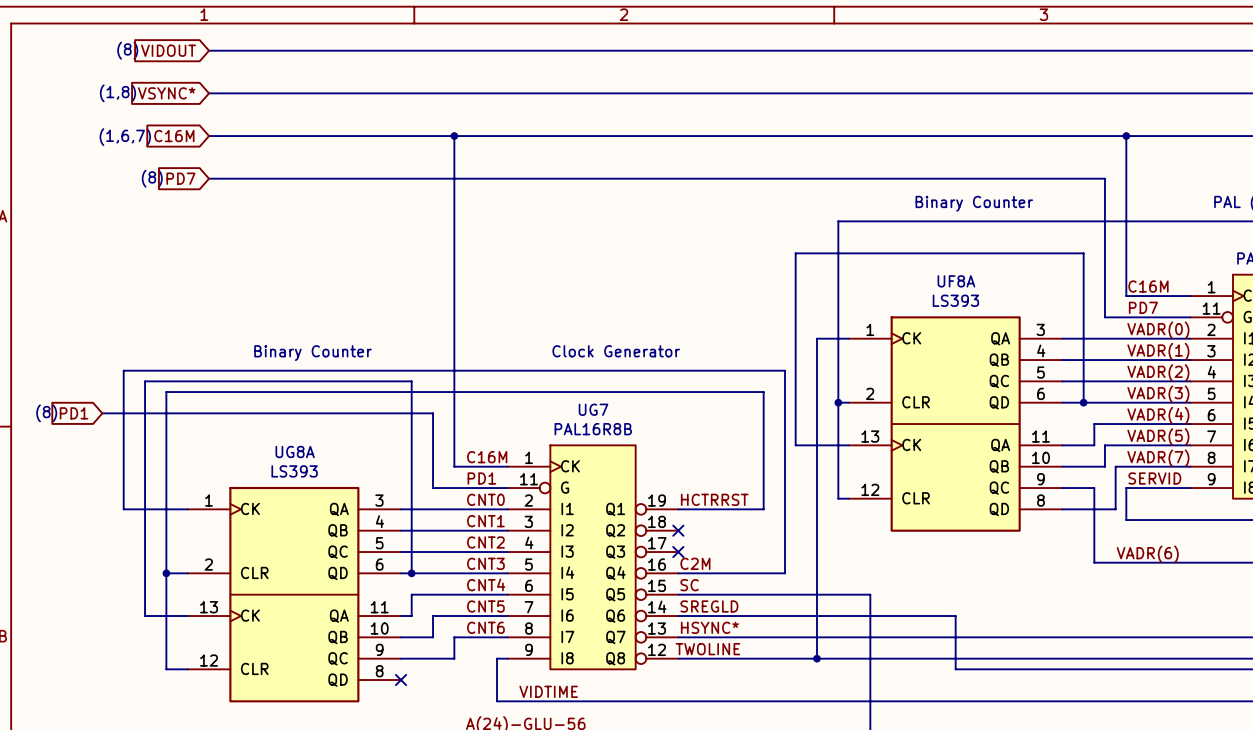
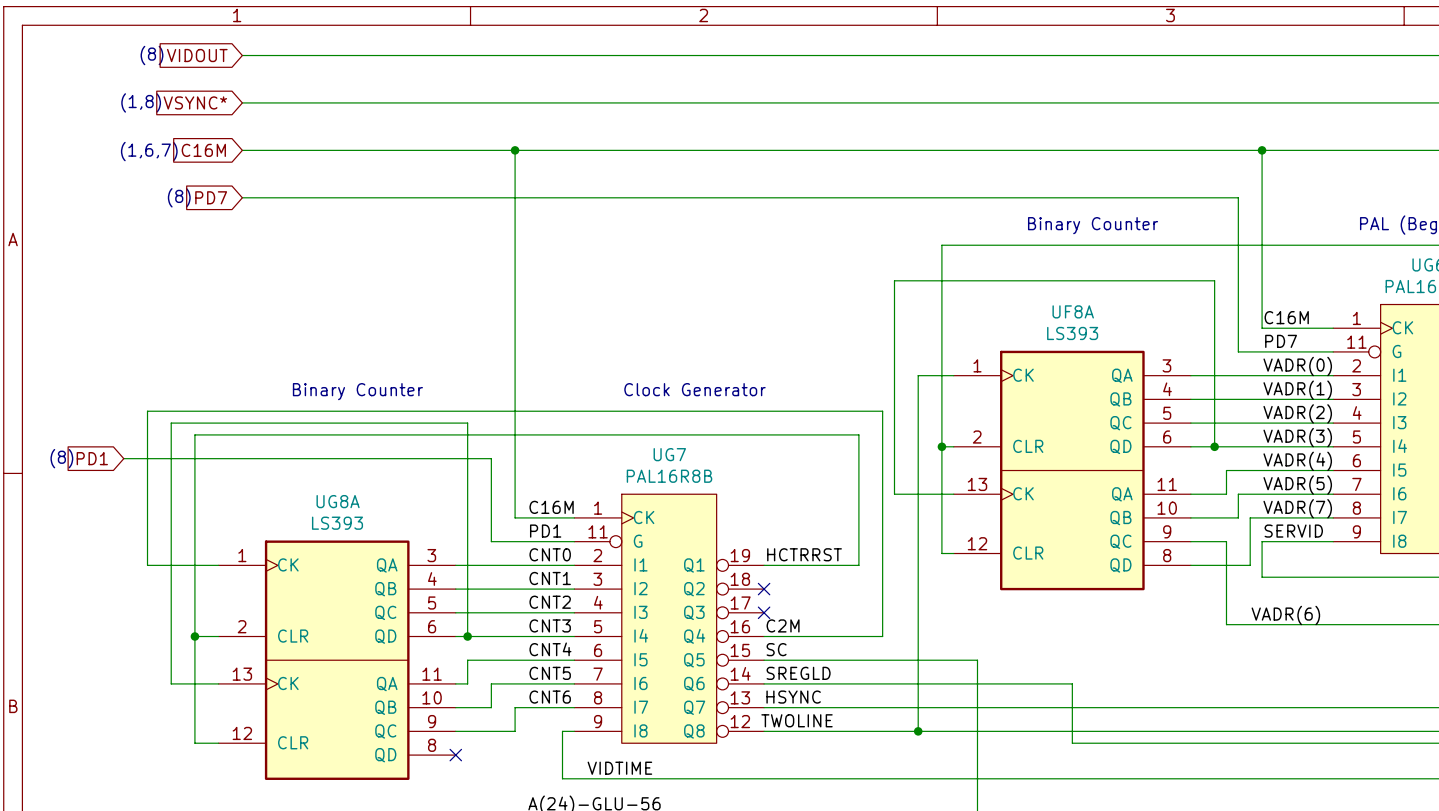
label: HSYNC* (709, 627) -> HSYNC (793, 697)

